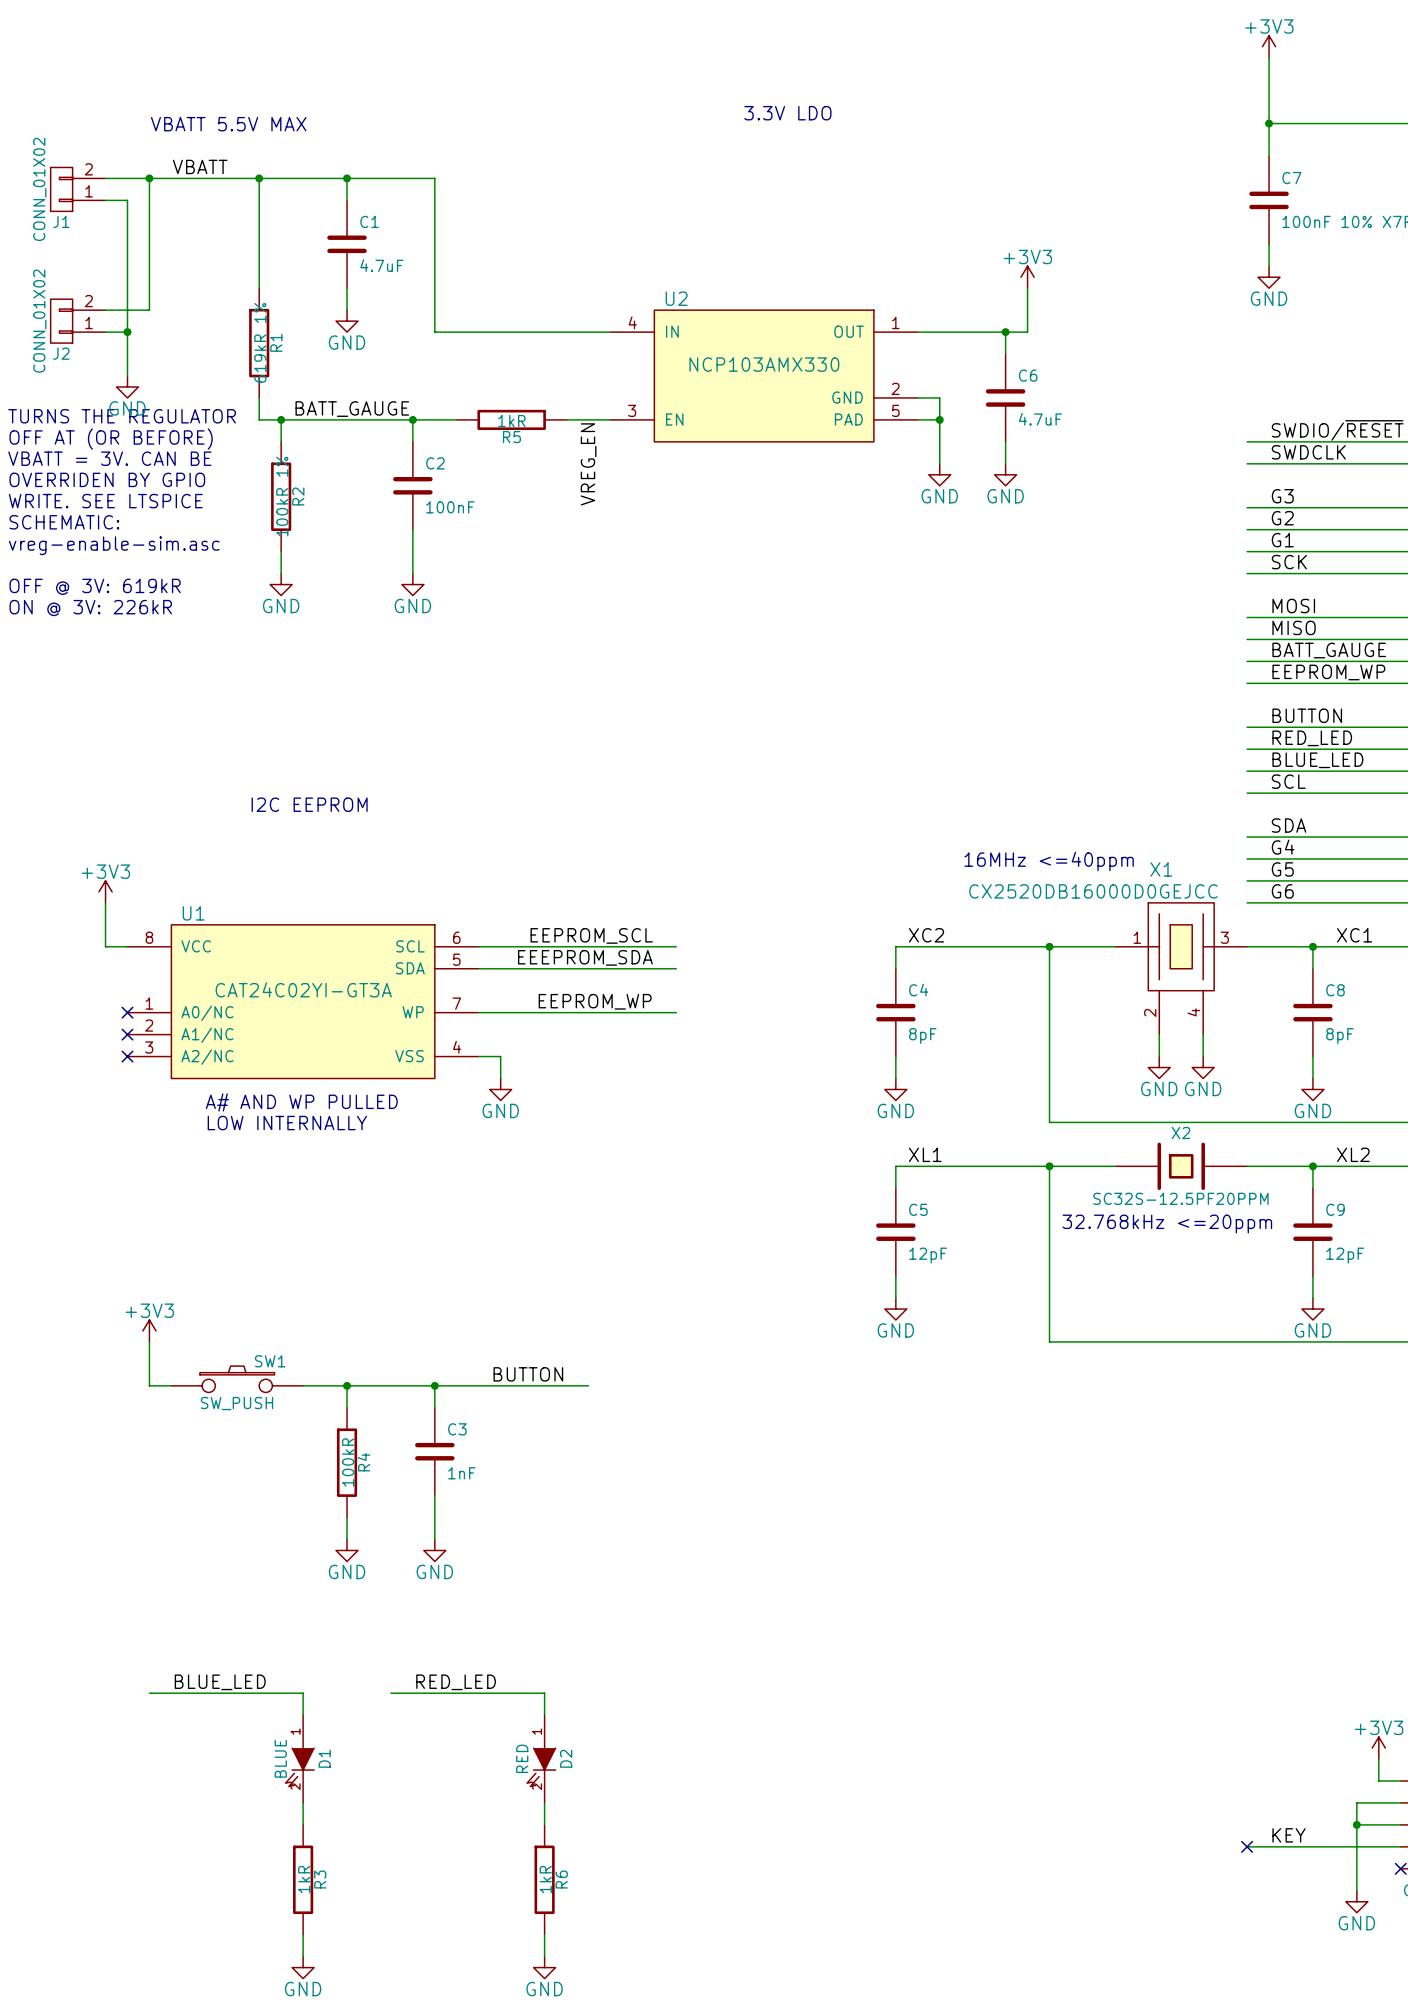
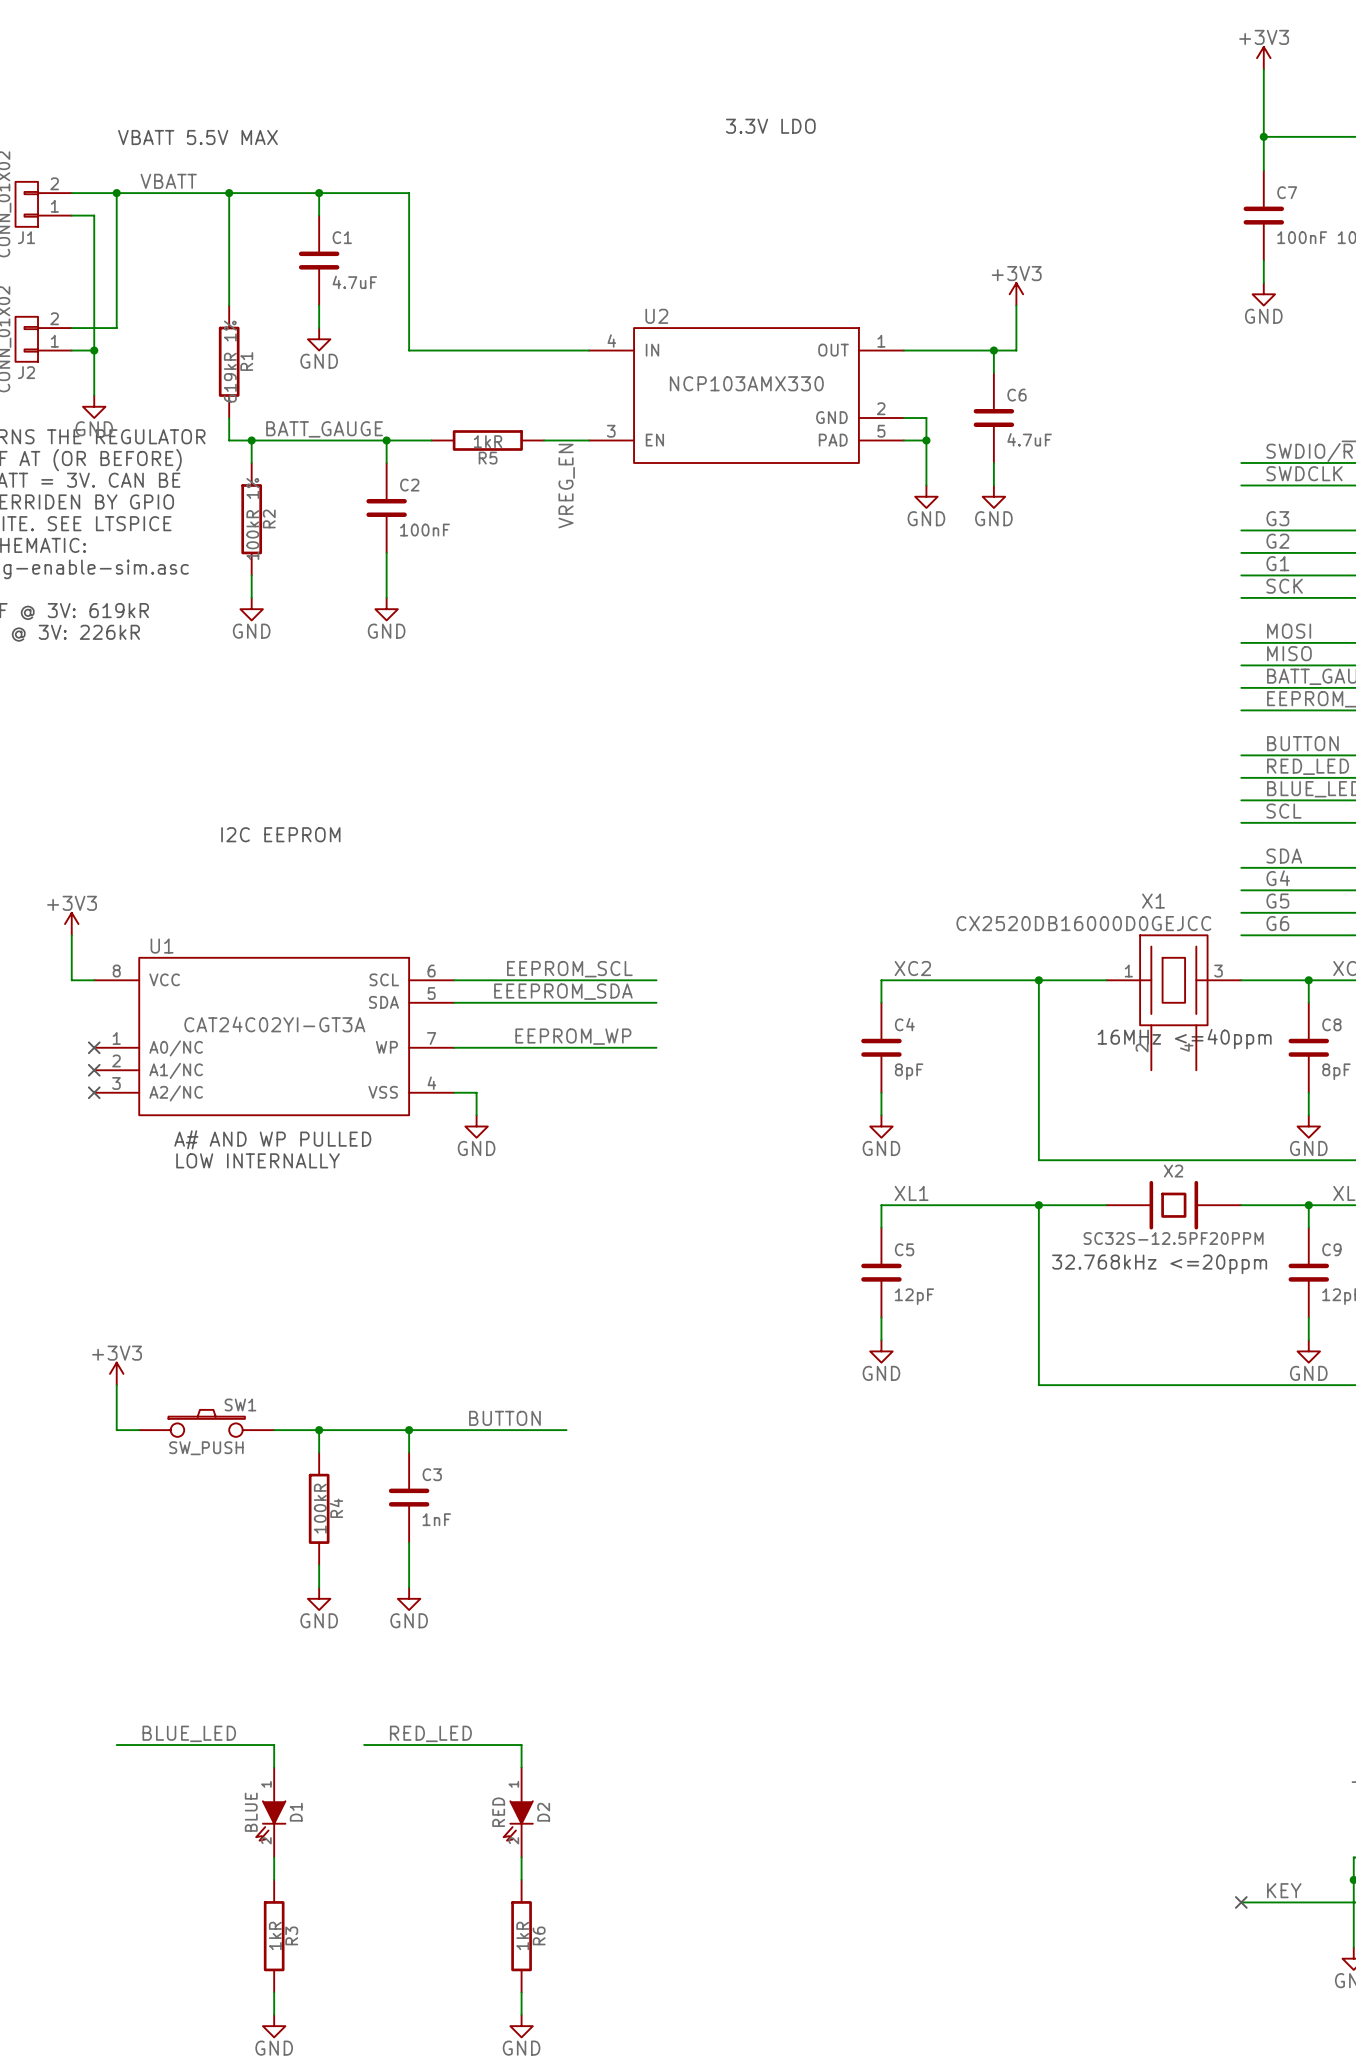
text position: 16MHz <=40ppm (1049, 861) -> 16MHz <=40ppm (1184, 1039)
wire: (1159, 1034) (1159, 1056) -> none
wire: (1203, 1034) (1203, 1056) -> none
power symbol: GND (1159, 1067) -> none
power symbol: GND (1203, 1067) -> none

